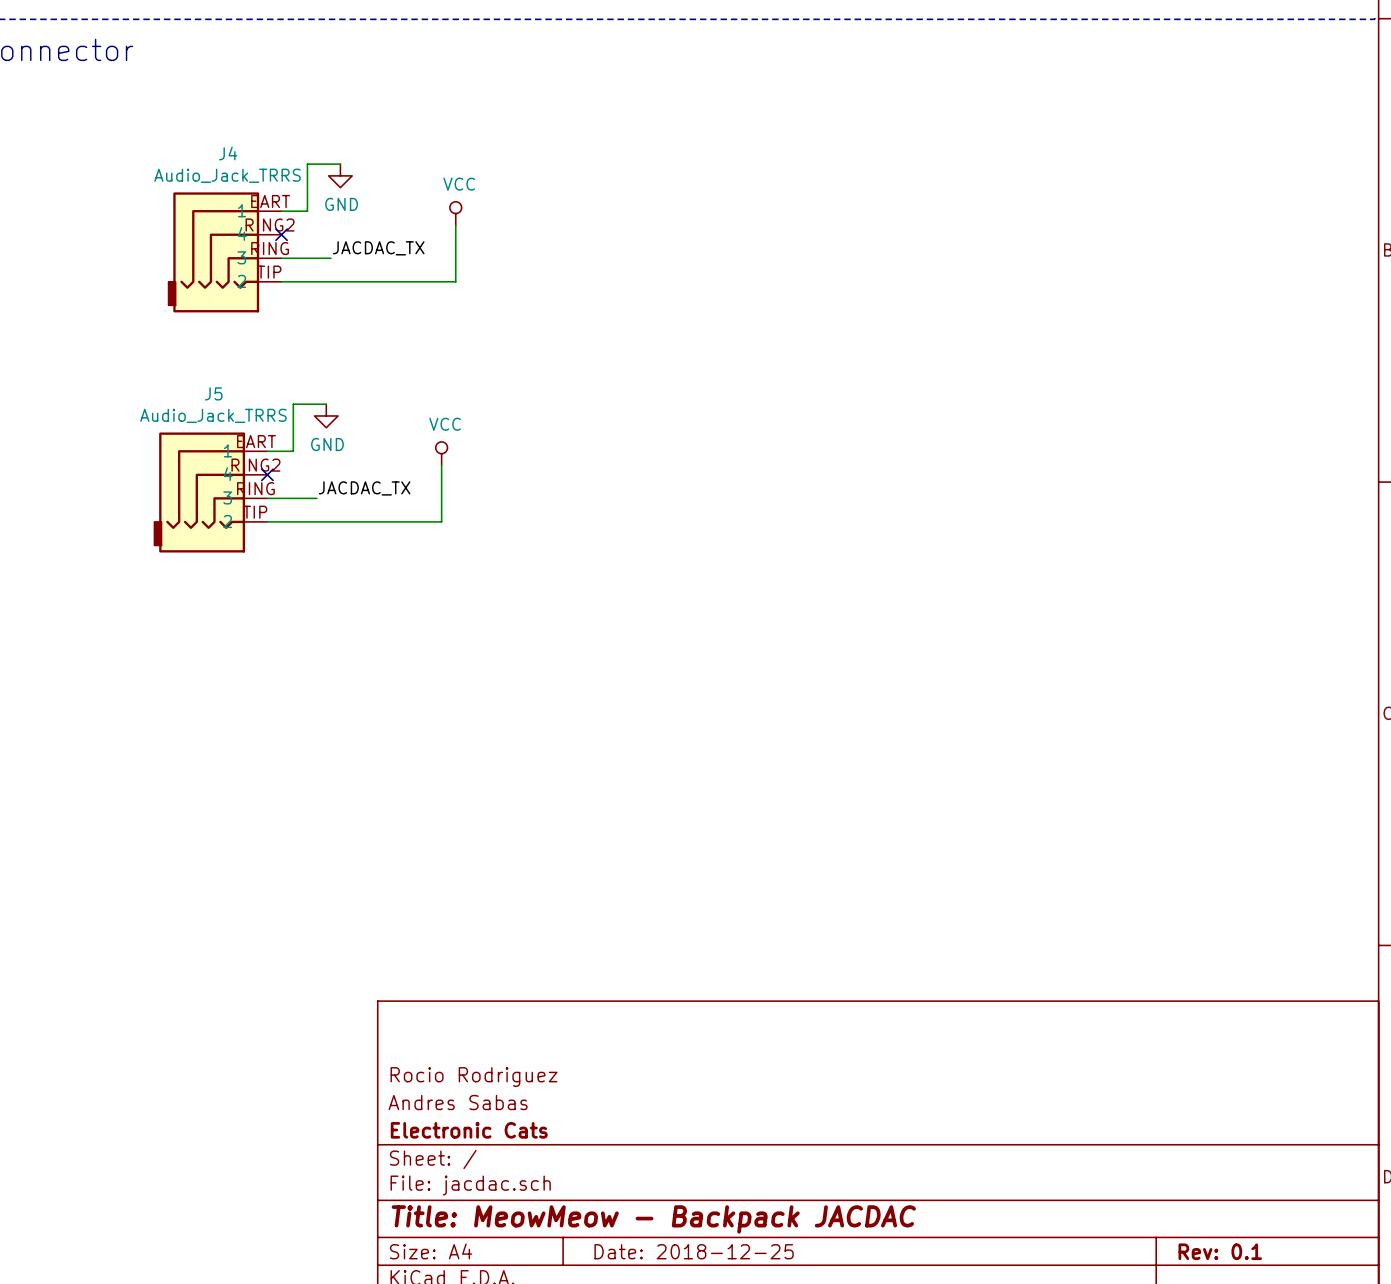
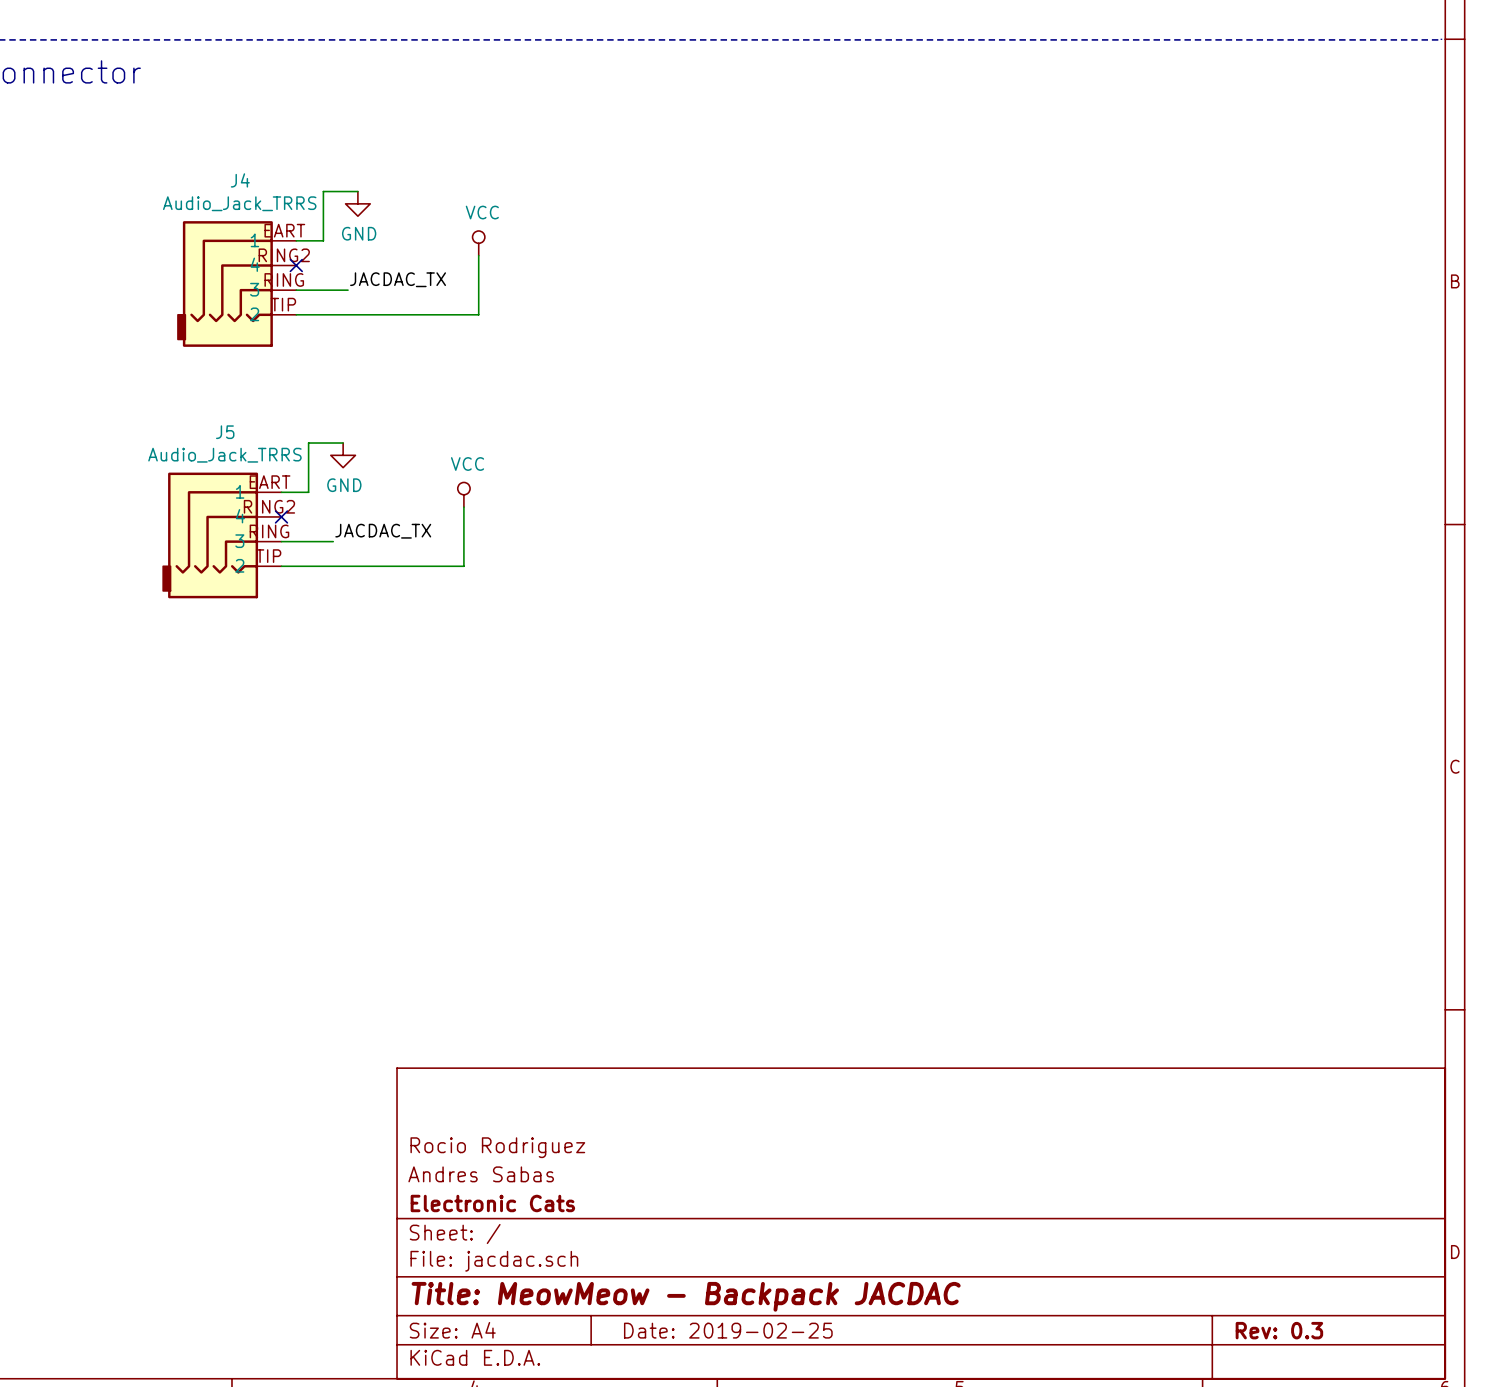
title block: Date: 2018-12-25 (694, 1251) -> Date: 2019-02-25 (728, 1330)
title block: Rev: 0.1 (1220, 1251) -> Rev: 0.3 (1279, 1330)

